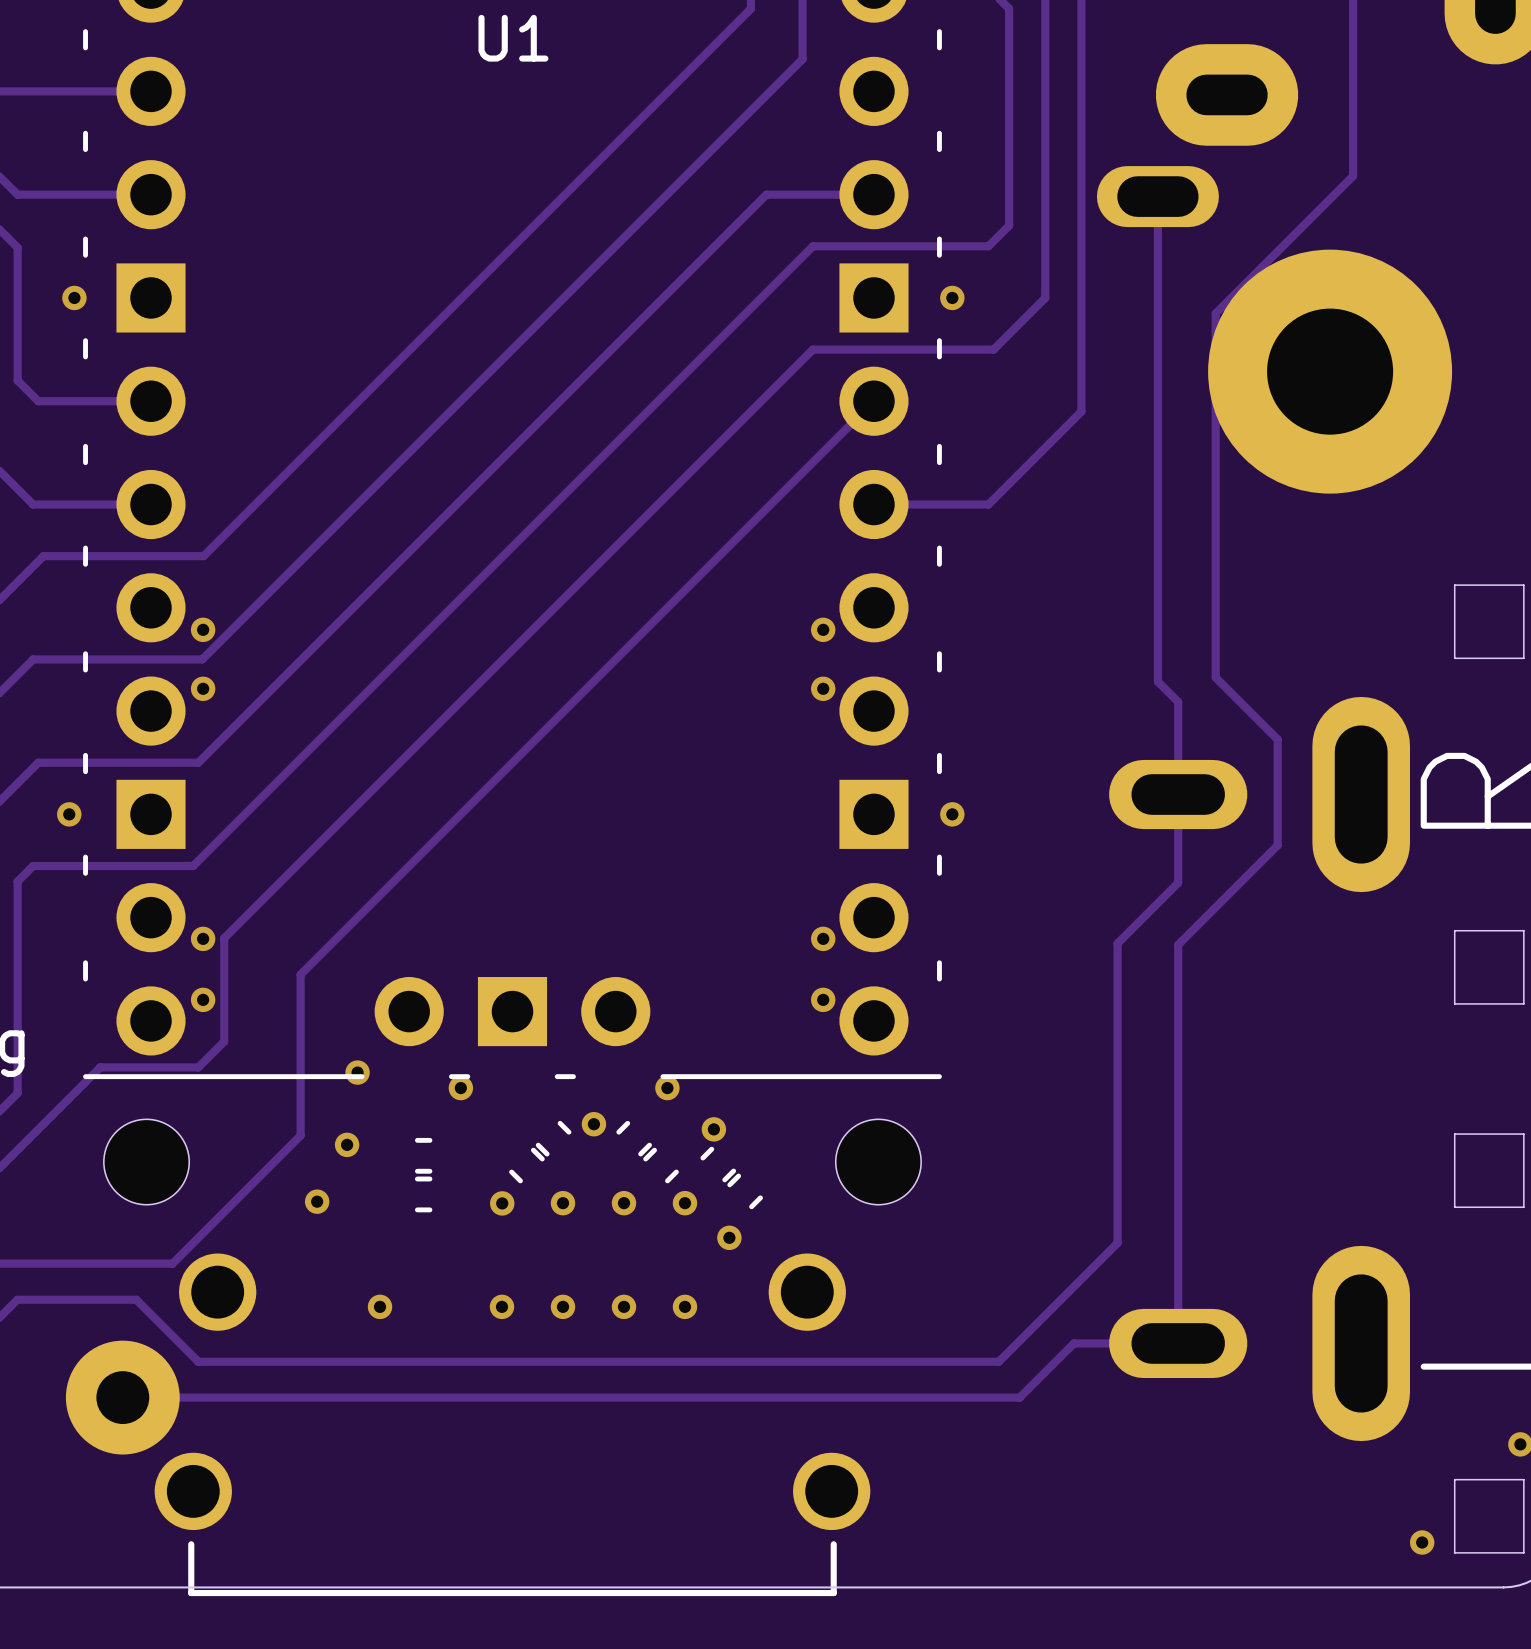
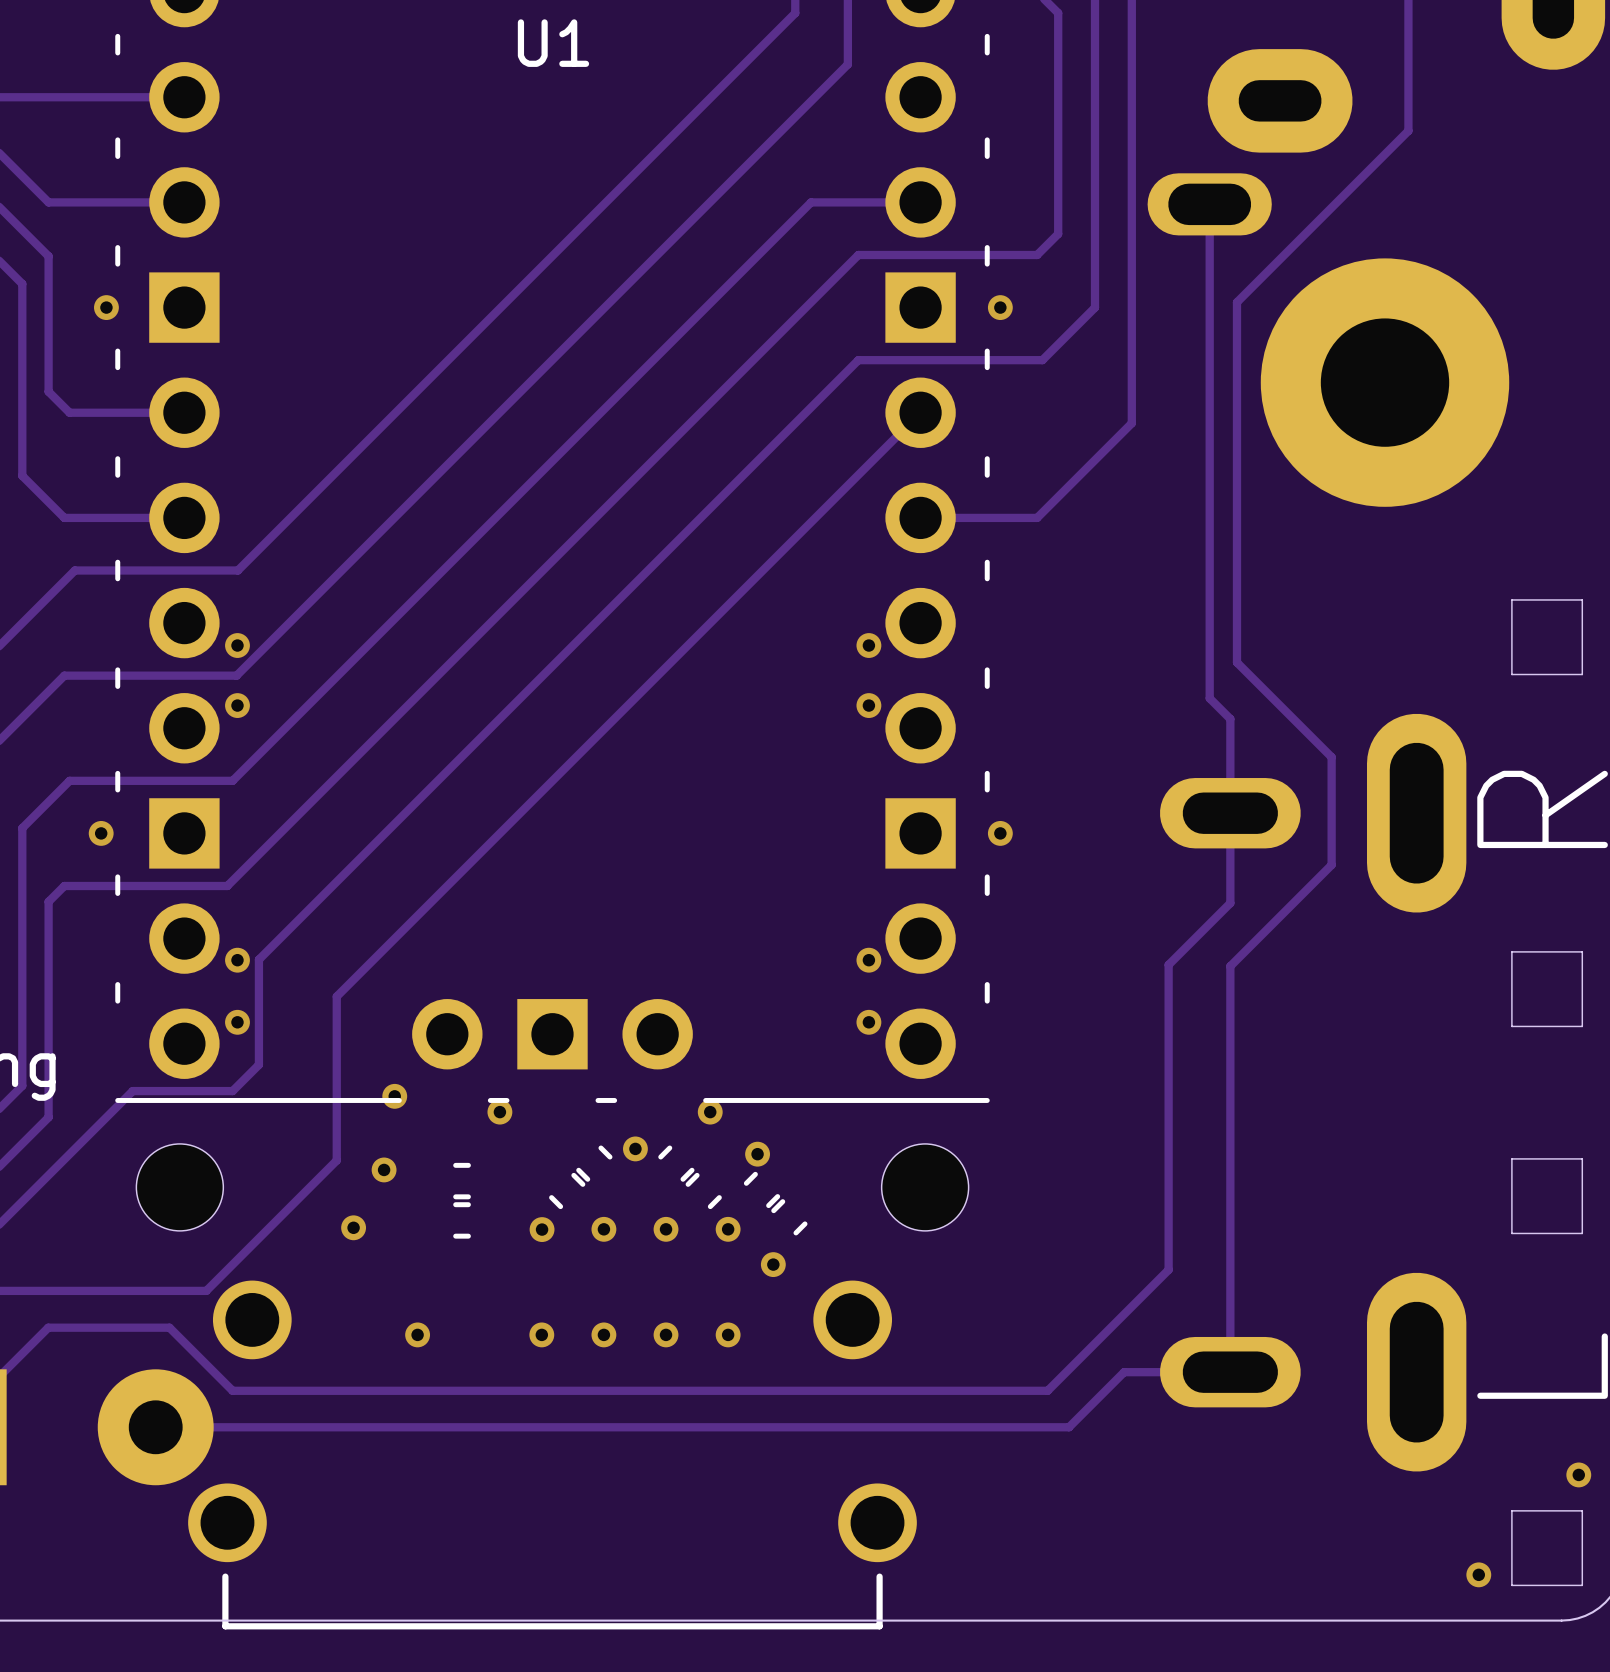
track: (1353, 124) (1353, 176) (1215, 313) (1215, 677) -> (1408, 130) (1236, 302) (1236, 662) (1268, 694)

